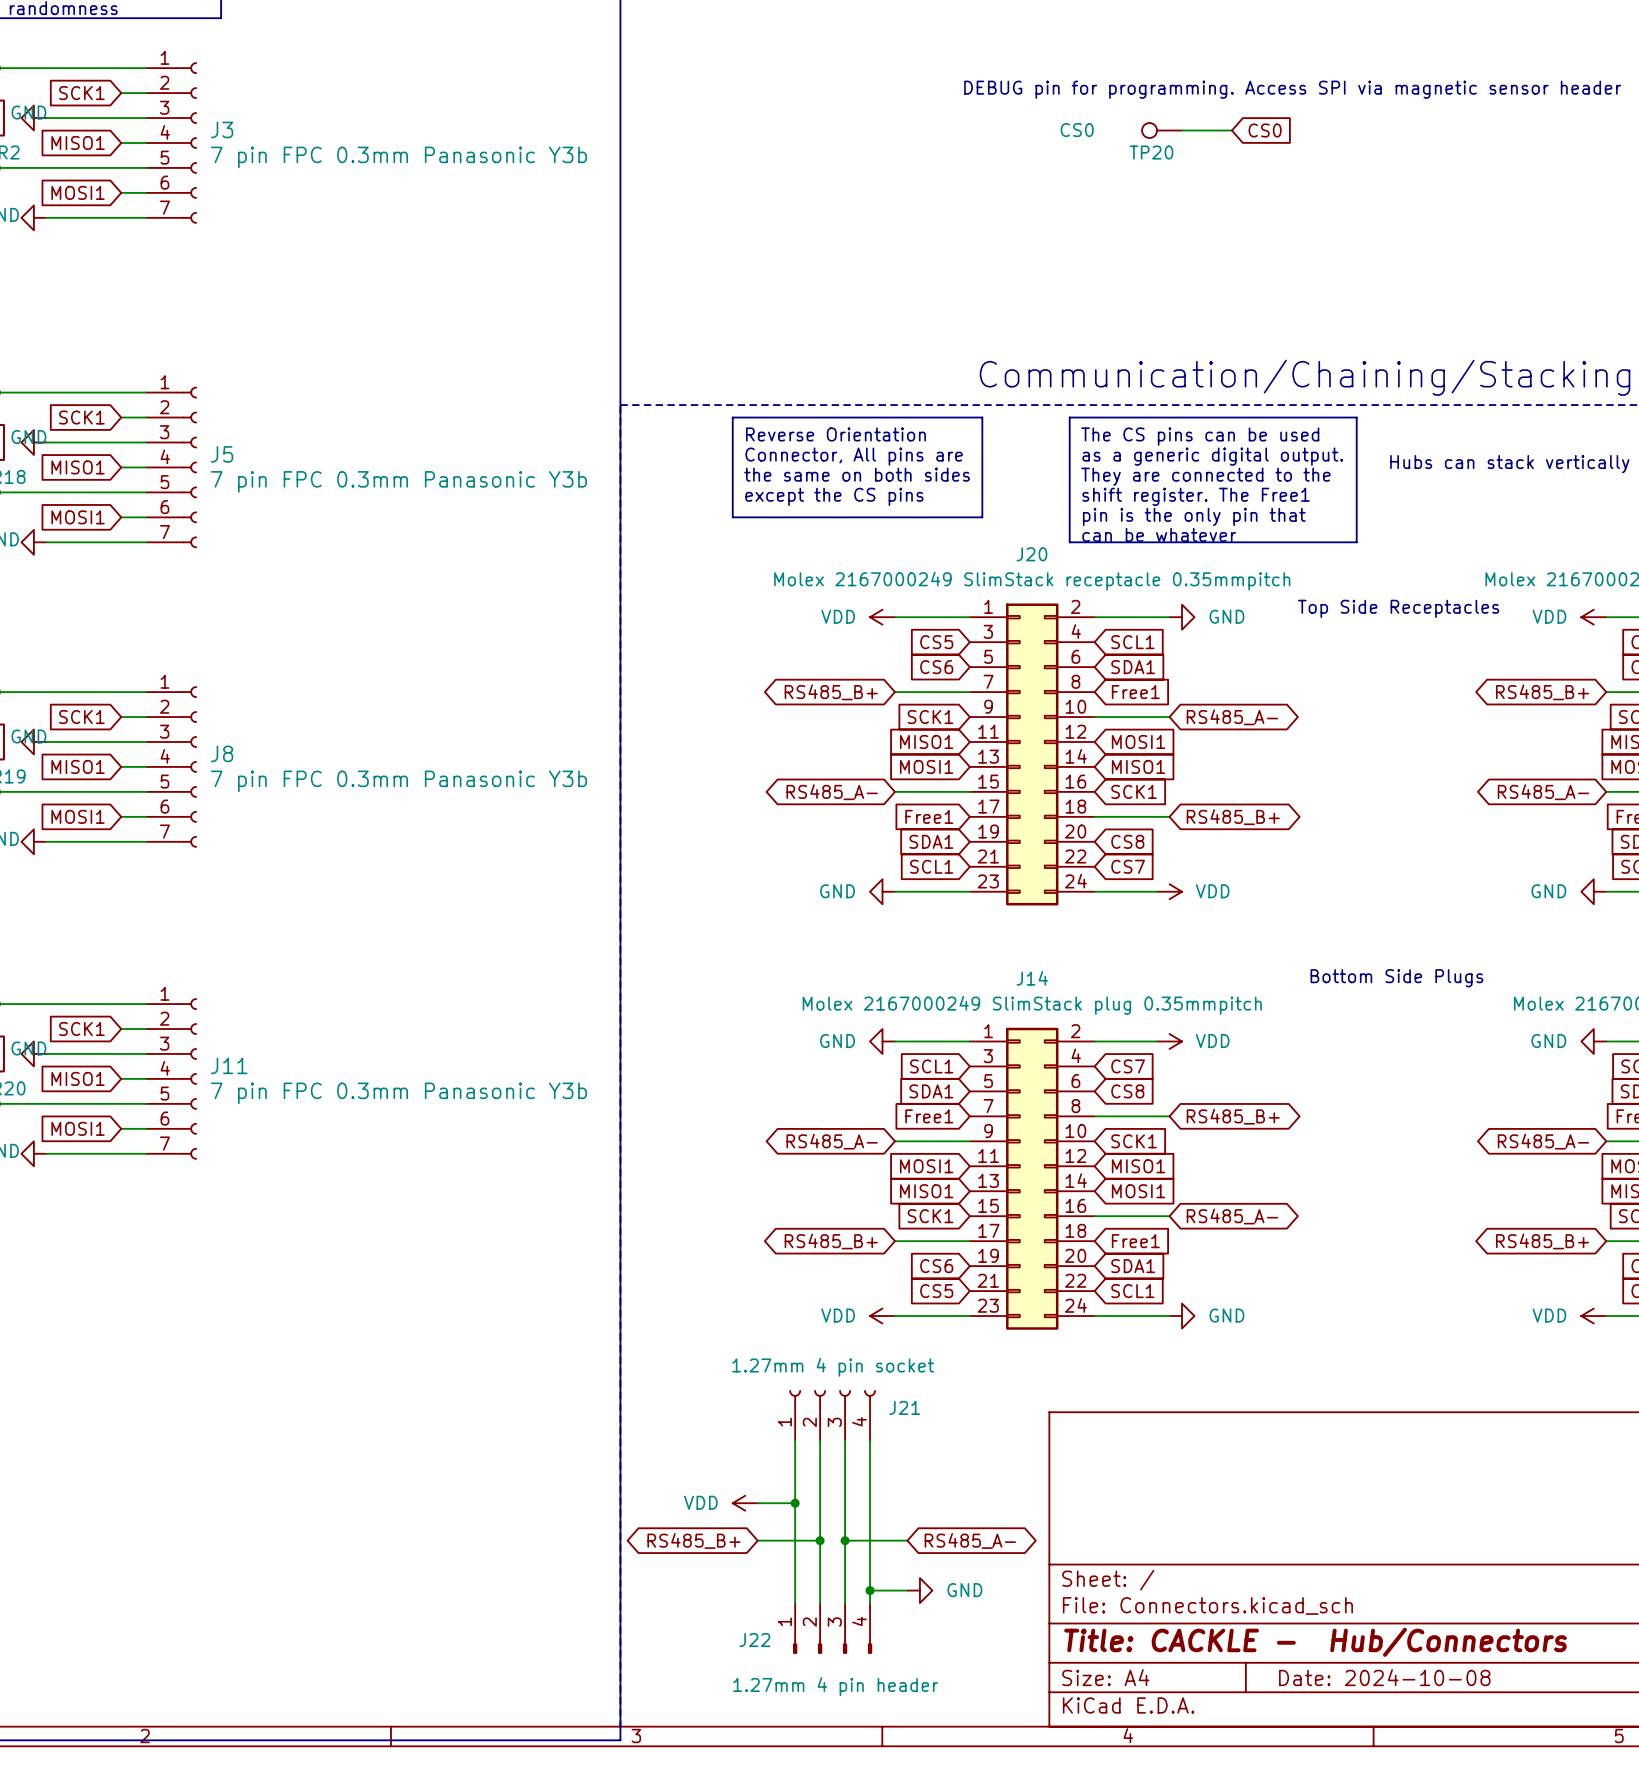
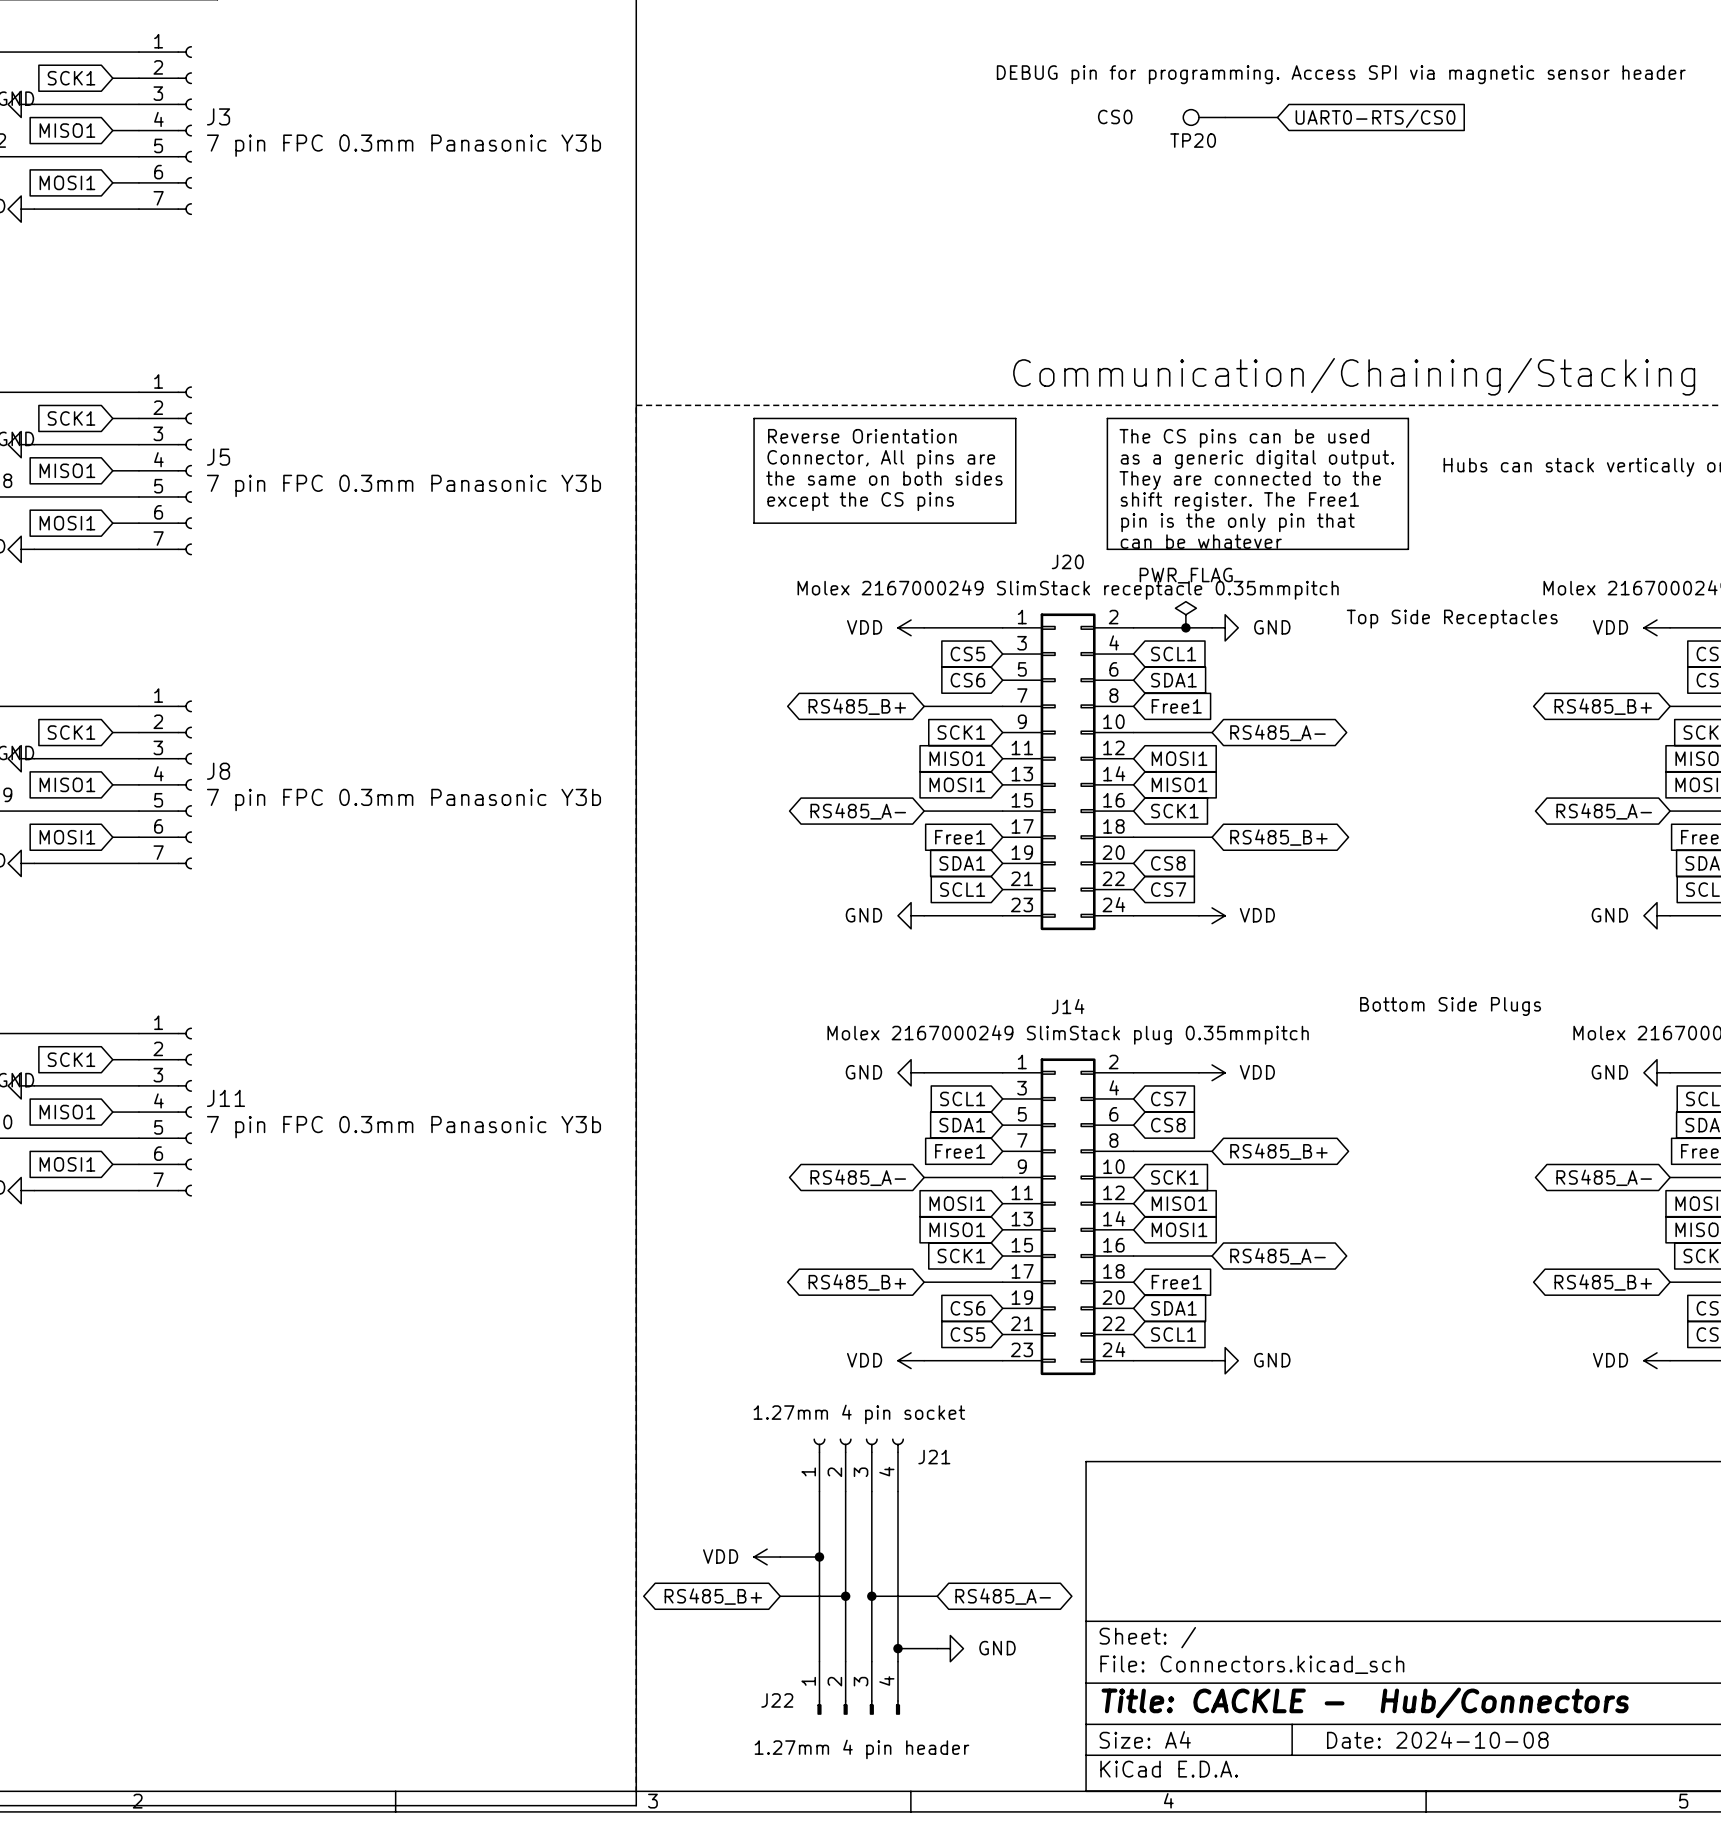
global label: CS0 (1265, 130) -> UART0-RTS/CS0 (1375, 118)
power symbol: none -> PWR_FLAG (1185, 614)
junction: none -> (1185, 627)

